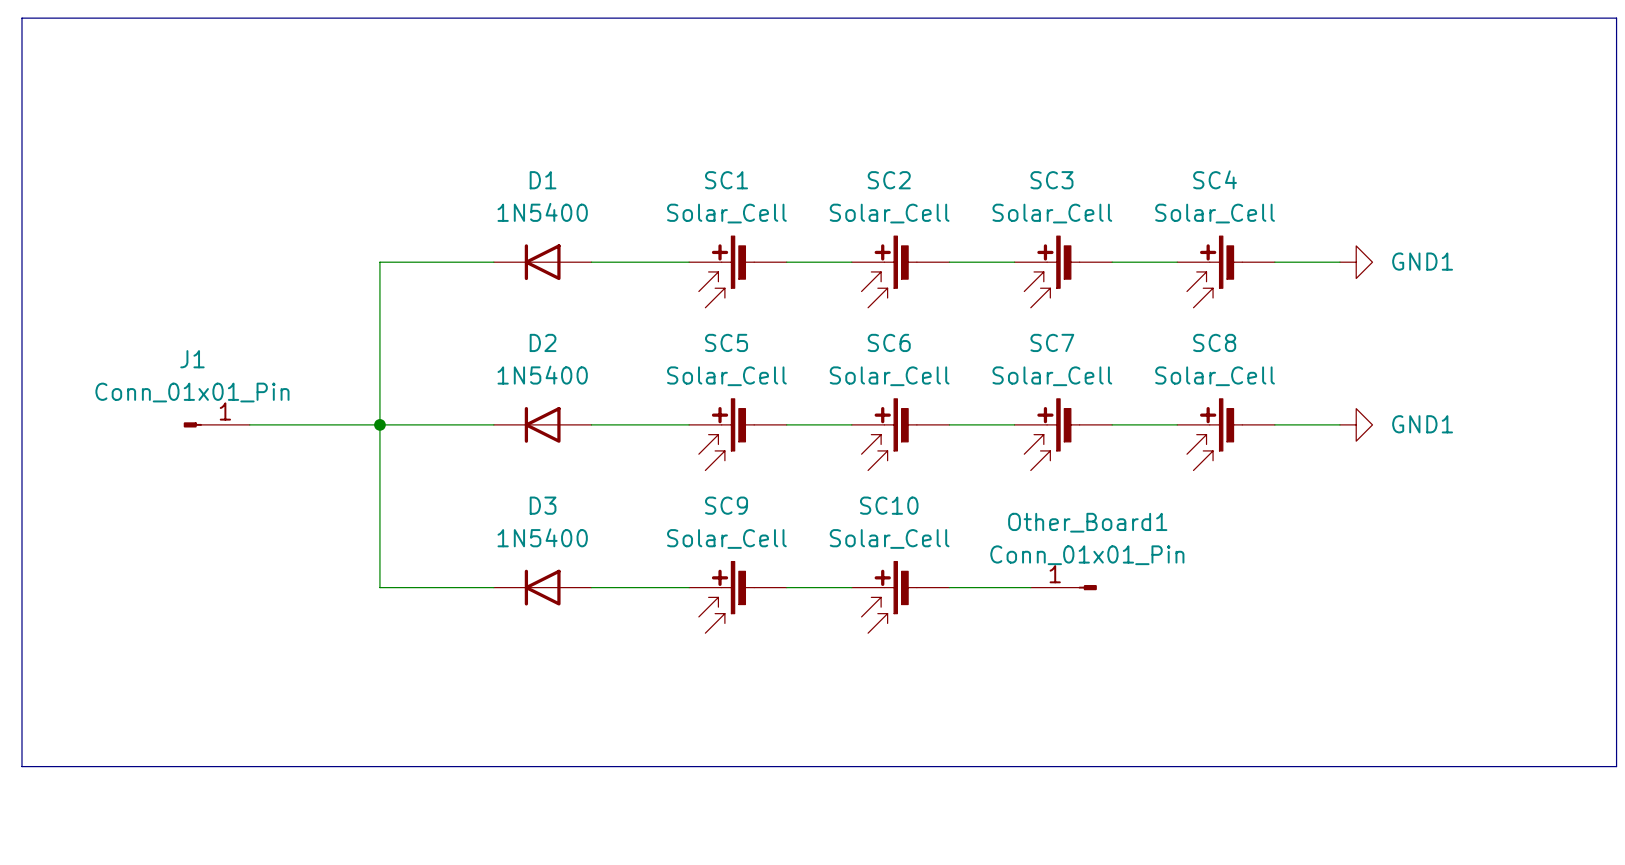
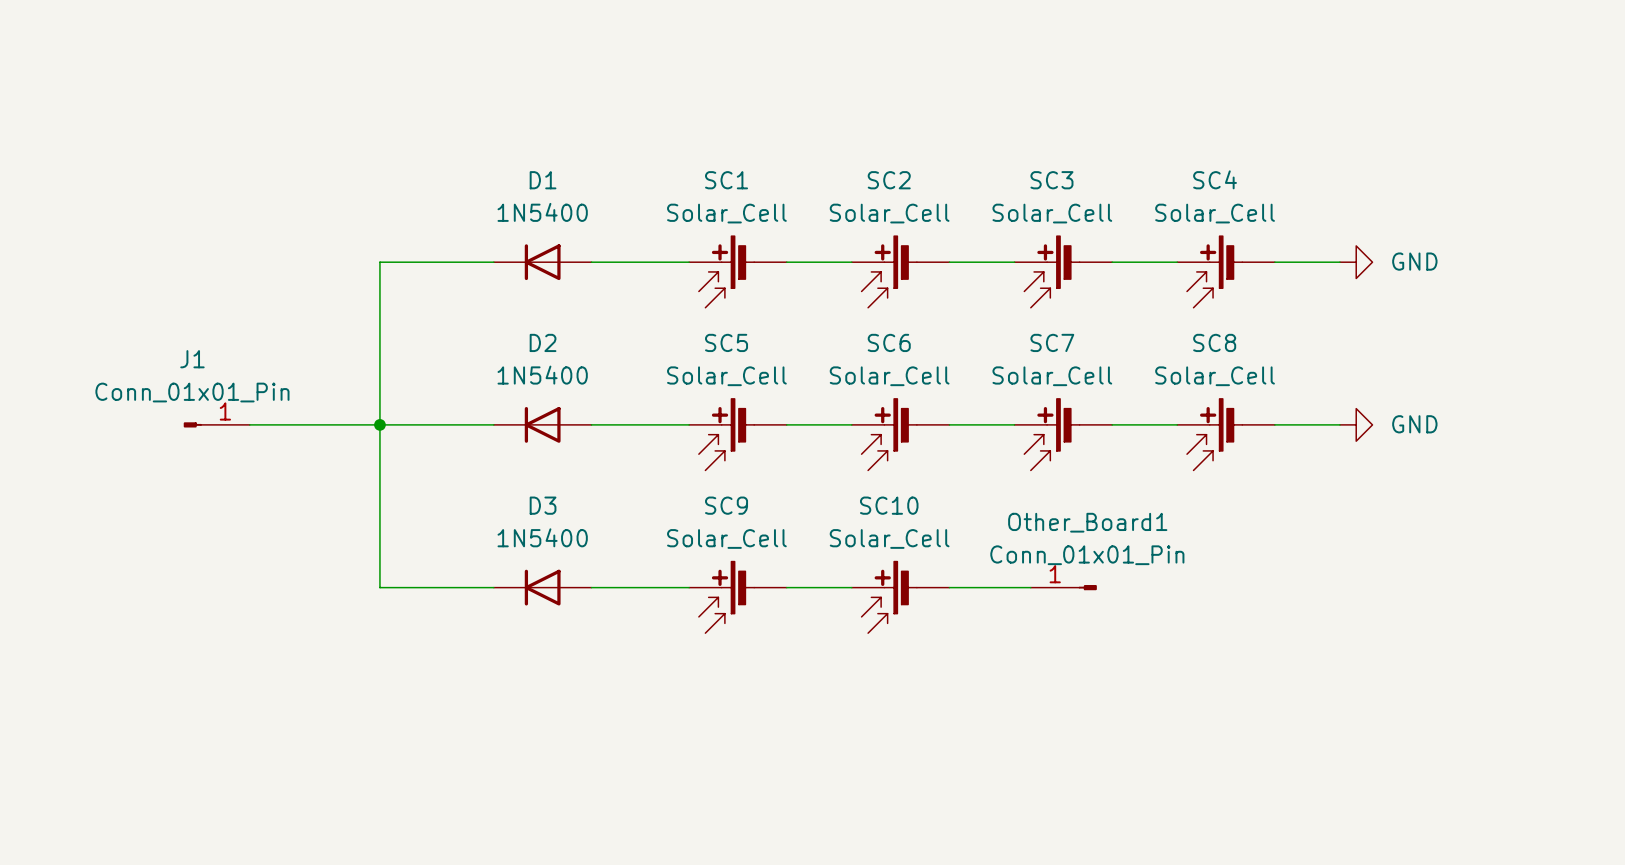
line: (21, 18) (1616, 18) (1616, 766) (21, 766) (21, 18) -> none
power symbol: GND1 (1356, 262) -> GND (1356, 262)
power symbol: GND1 (1356, 424) -> GND (1356, 424)

